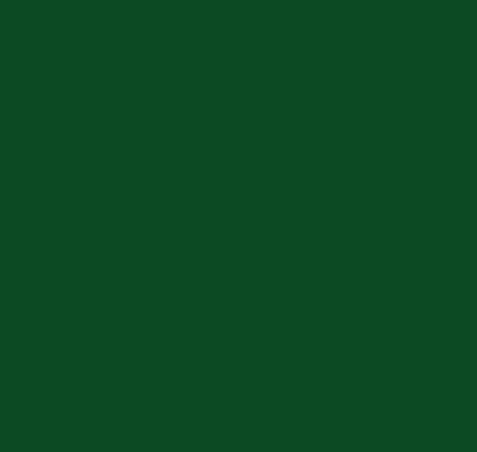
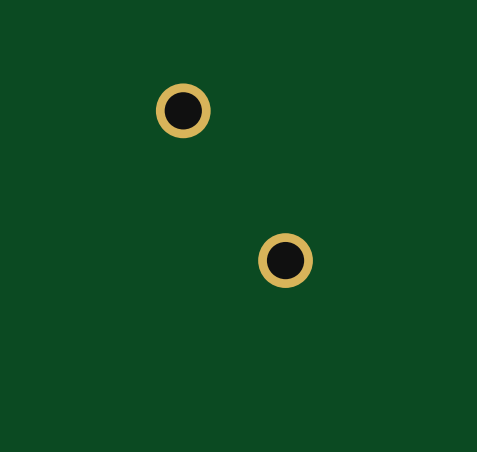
part: none -> (183, 110)
part: none -> (285, 260)

